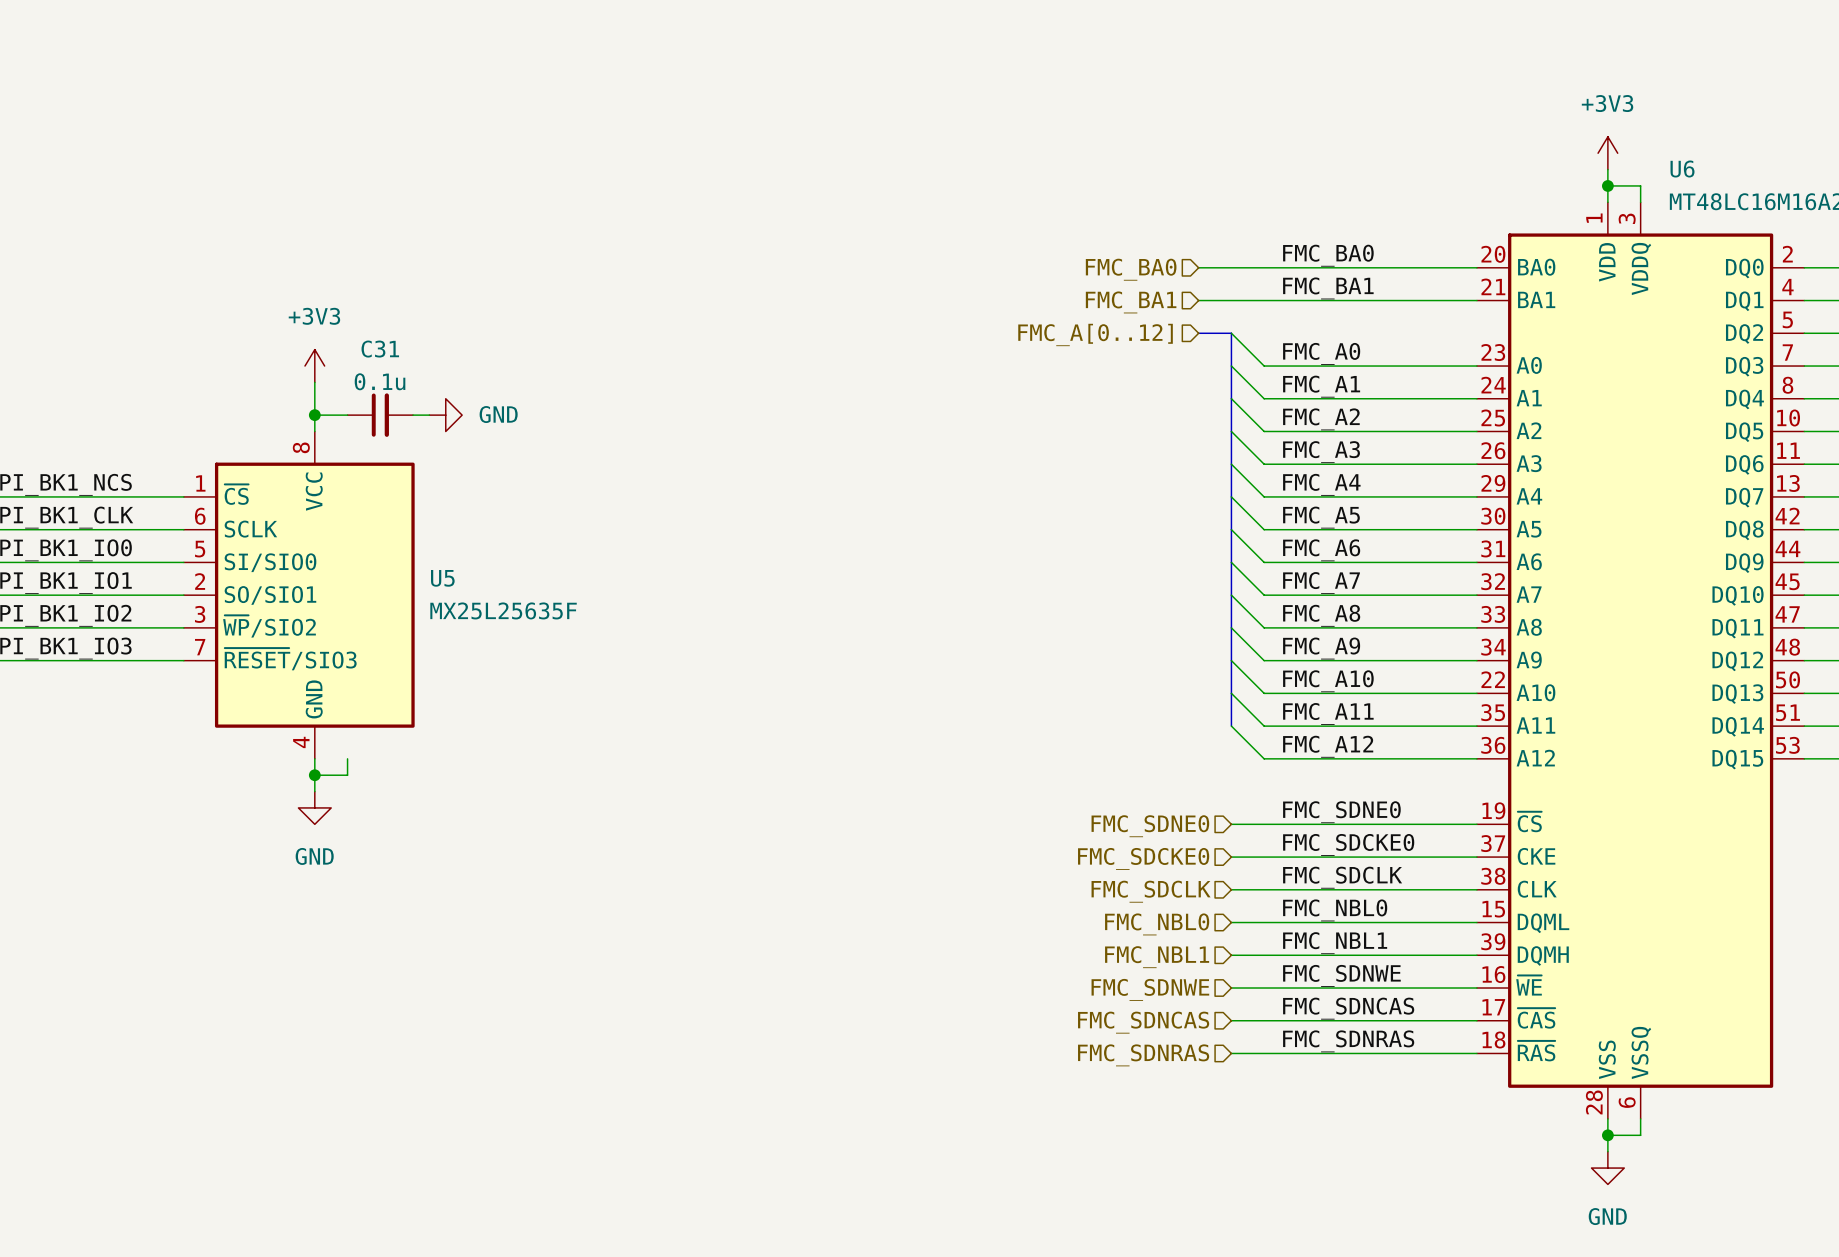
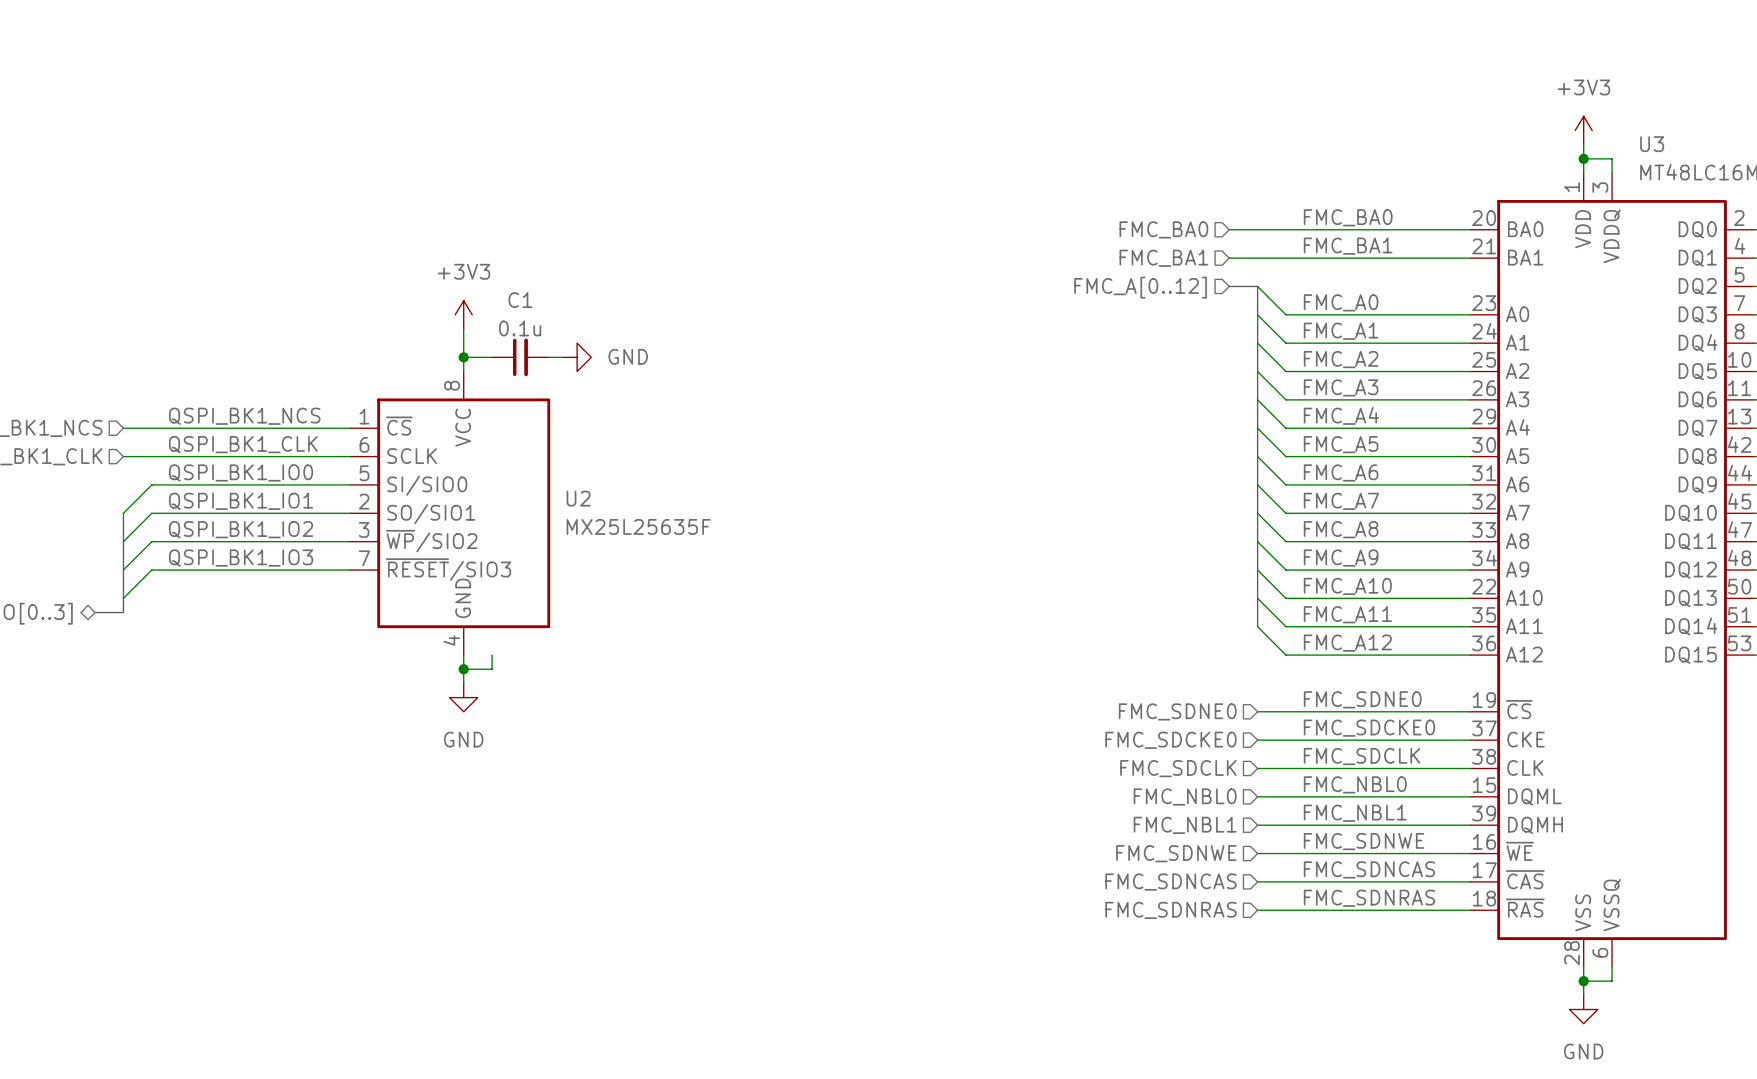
U6 name: U6 (1682, 169) -> U3 (1652, 144)
C31 name: C31 (380, 349) -> C1 (520, 300)
U5 name: U5 (442, 578) -> U2 (578, 498)

